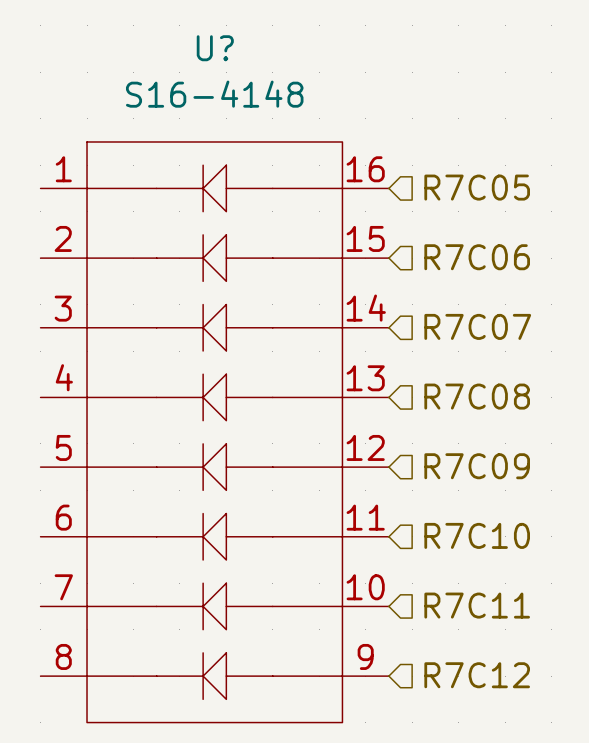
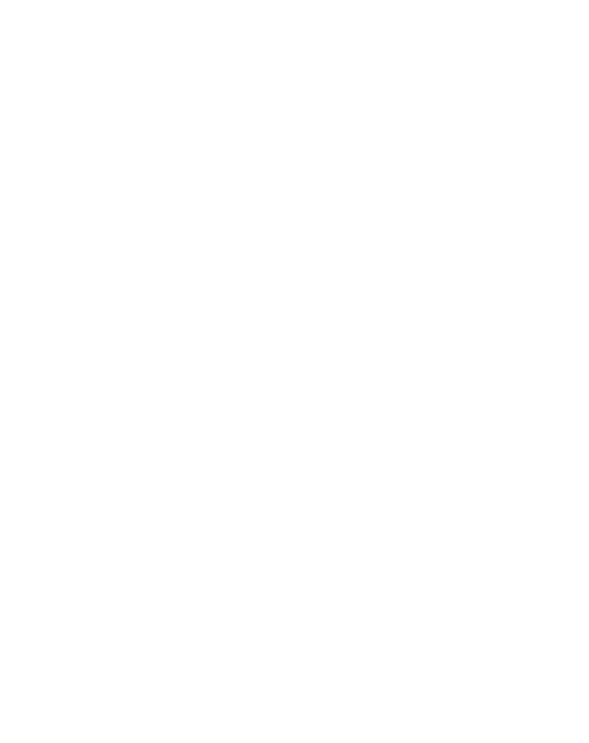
hierarchical label: R7C05 (477, 187) -> none
hierarchical label: R7C06 (477, 257) -> none
hierarchical label: R7C07 (477, 326) -> none
hierarchical label: R7C08 (477, 396) -> none
U?: S16-4148 (214, 432) -> none
hierarchical label: R7C09 (477, 466) -> none
hierarchical label: R7C10 (477, 535) -> none
hierarchical label: R7C11 (477, 605) -> none
hierarchical label: R7C12 (477, 675) -> none

